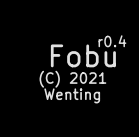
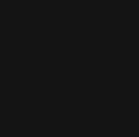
text: r0.4 (112, 41) -> none
text: Fobu (83, 55) -> none
text: (C) 2021 (72, 79) -> none
text: Wenting (72, 95) -> none

